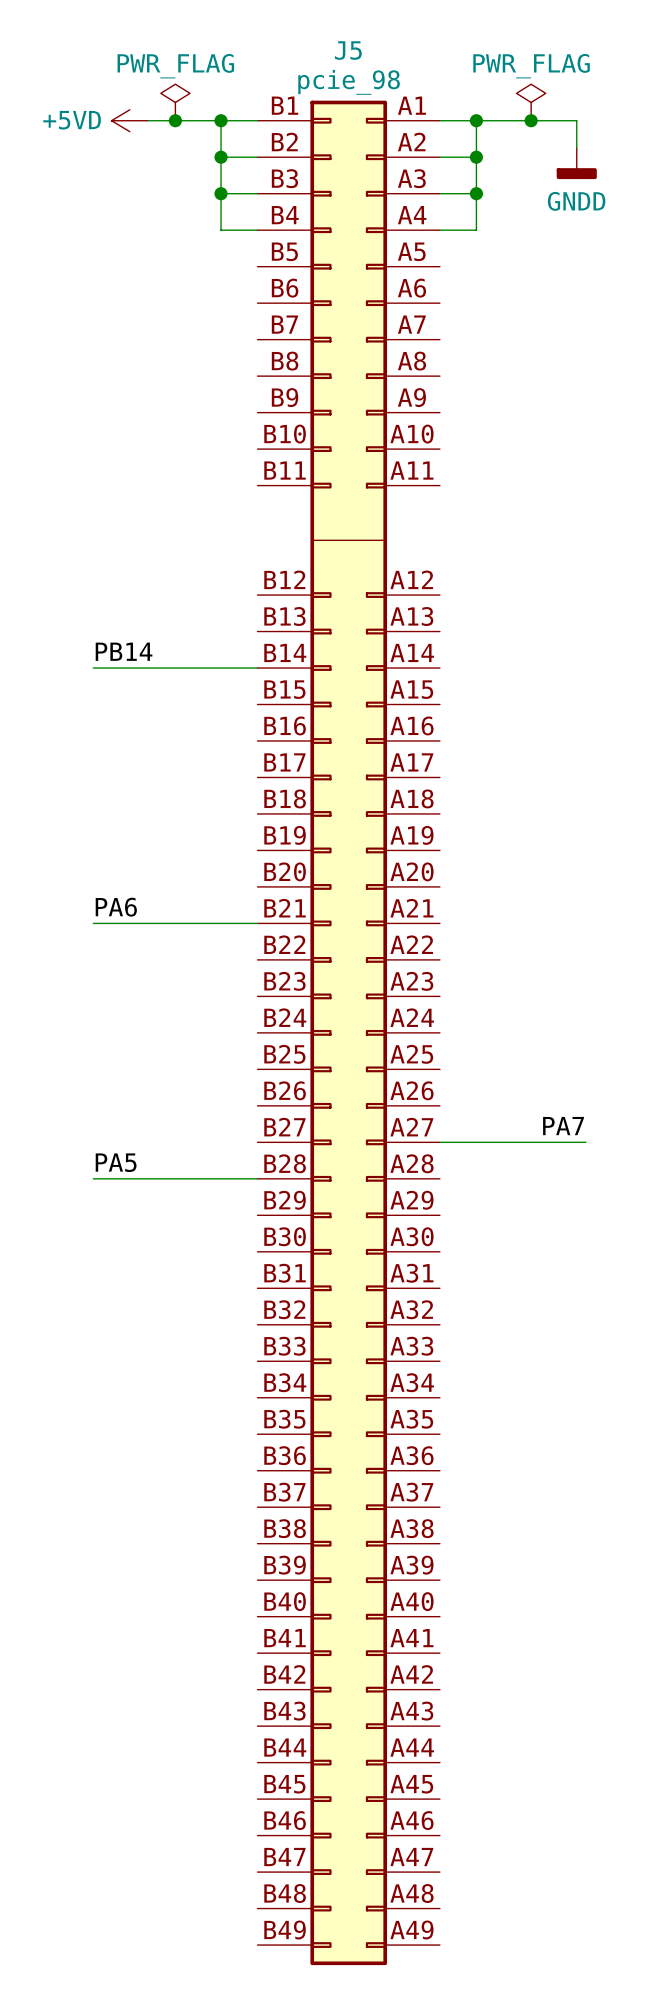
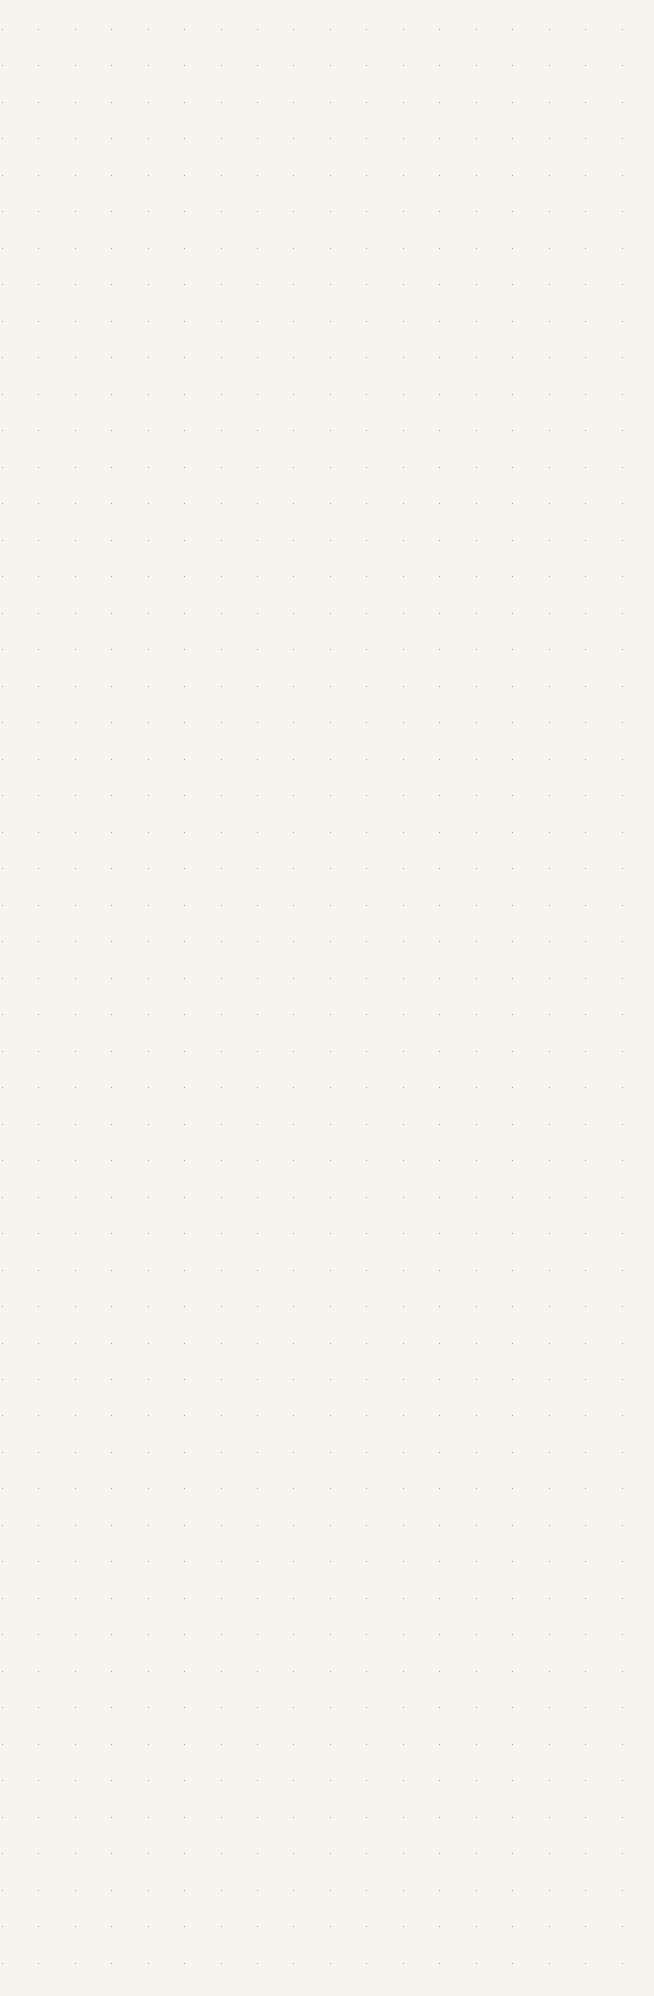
power symbol: PWR_FLAG (175, 102) -> none
power symbol: PWR_FLAG (531, 102) -> none
power symbol: +5VD (129, 120) -> none
wire: (148, 120) (257, 120) -> none
junction: (175, 120) -> none
wire: (221, 120) (221, 230) (257, 230) -> none
junction: (221, 120) -> none
wire: (439, 120) (576, 120) (576, 148) -> none
wire: (476, 120) (476, 230) (439, 230) -> none
junction: (476, 120) -> none
junction: (531, 120) -> none
wire: (221, 157) (257, 157) -> none
junction: (221, 157) -> none
wire: (439, 157) (476, 157) -> none
junction: (476, 157) -> none
power symbol: GNDD (576, 163) -> none
wire: (221, 193) (257, 193) -> none
junction: (221, 193) -> none
wire: (439, 193) (476, 193) -> none
junction: (476, 193) -> none
label: PB14 (124, 651) -> none
wire: (93, 668) (257, 668) -> none
label: PA6 (116, 907) -> none
wire: (93, 923) (257, 923) -> none
J5: pcie_98 (348, 1032) -> none
label: PA7 (563, 1126) -> none
wire: (439, 1142) (585, 1142) -> none
label: PA5 (116, 1162) -> none
wire: (93, 1178) (257, 1178) -> none

